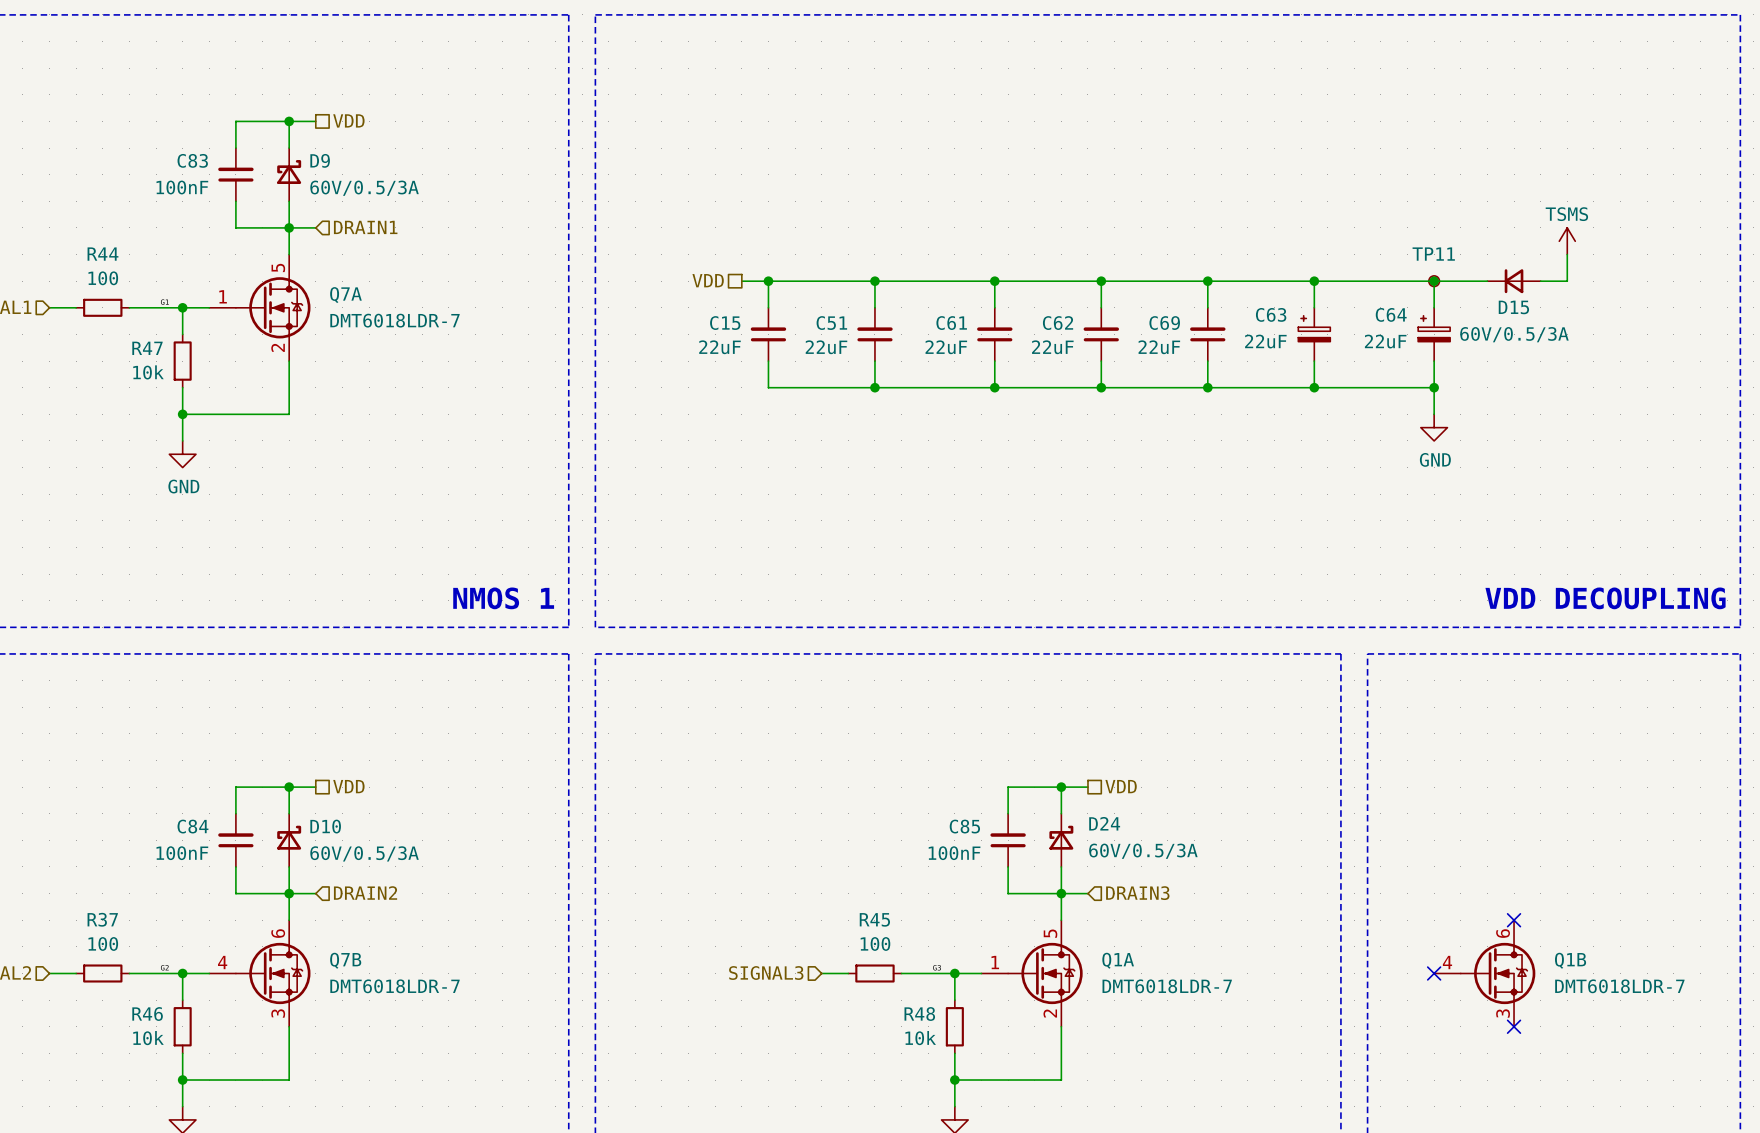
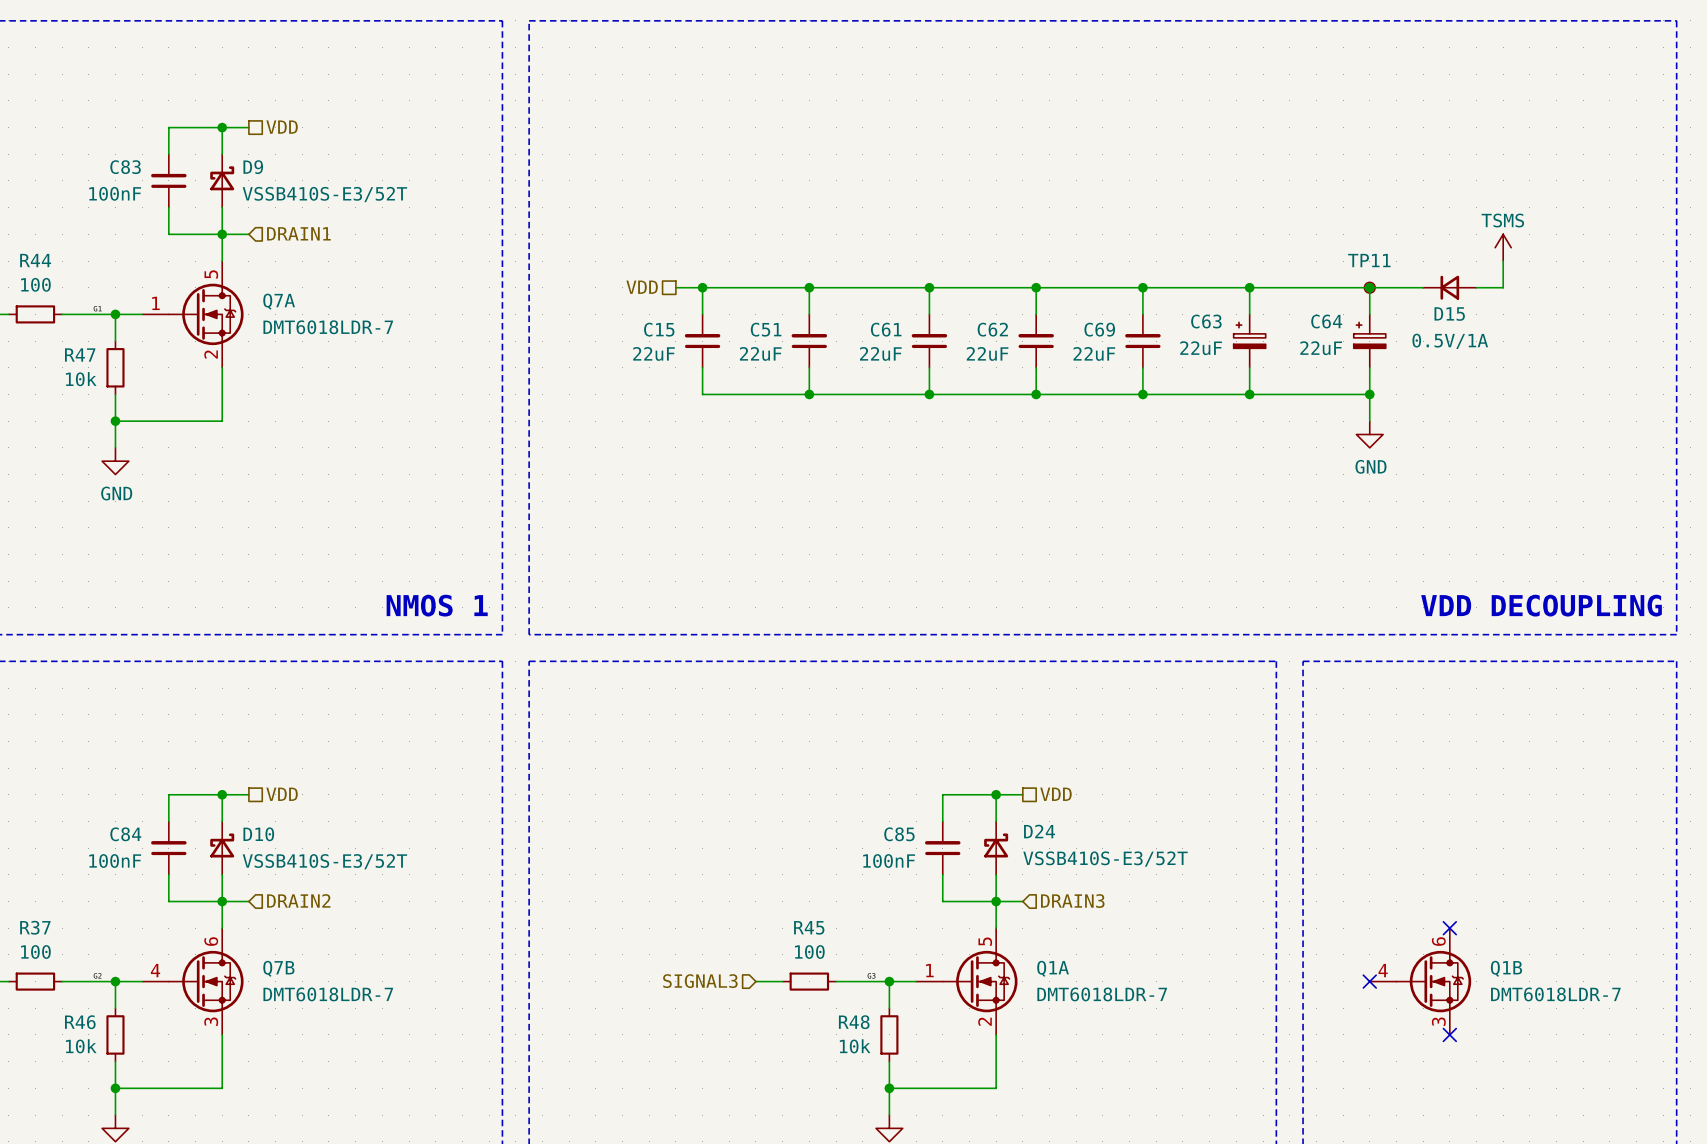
D9 value: 60V/0.5/3A (364, 188) -> VSSB410S-E3/52T (324, 194)
D15 value: 60V/0.5/3A (1514, 334) -> 0.5V/1A (1450, 341)
D24 value: 60V/0.5/3A (1143, 851) -> VSSB410S-E3/52T (1105, 859)
D10 value: 60V/0.5/3A (364, 853) -> VSSB410S-E3/52T (324, 861)

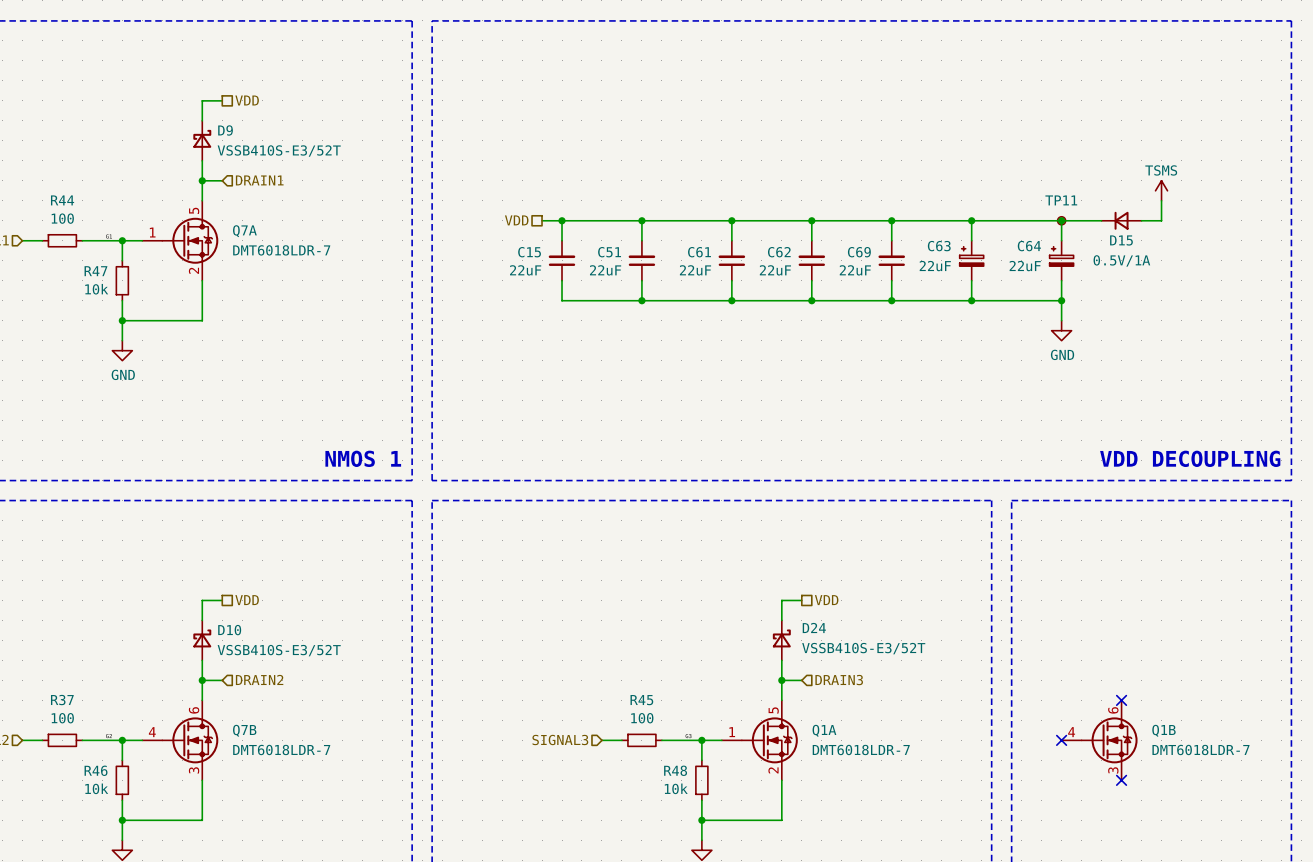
wire: (222, 127) (168, 127) (168, 154) -> none
junction: (222, 127) -> none
C83: 100nF (168, 180) -> none
wire: (168, 207) (168, 234) (222, 234) -> none
wire: (222, 794) (168, 794) (168, 821) -> none
junction: (222, 794) -> none
wire: (996, 794) (942, 794) (942, 821) -> none
junction: (996, 794) -> none
C84: 100nF (168, 848) -> none
C85: 100nF (942, 848) -> none
wire: (168, 874) (168, 901) (222, 901) -> none
wire: (942, 874) (942, 901) (996, 901) -> none

